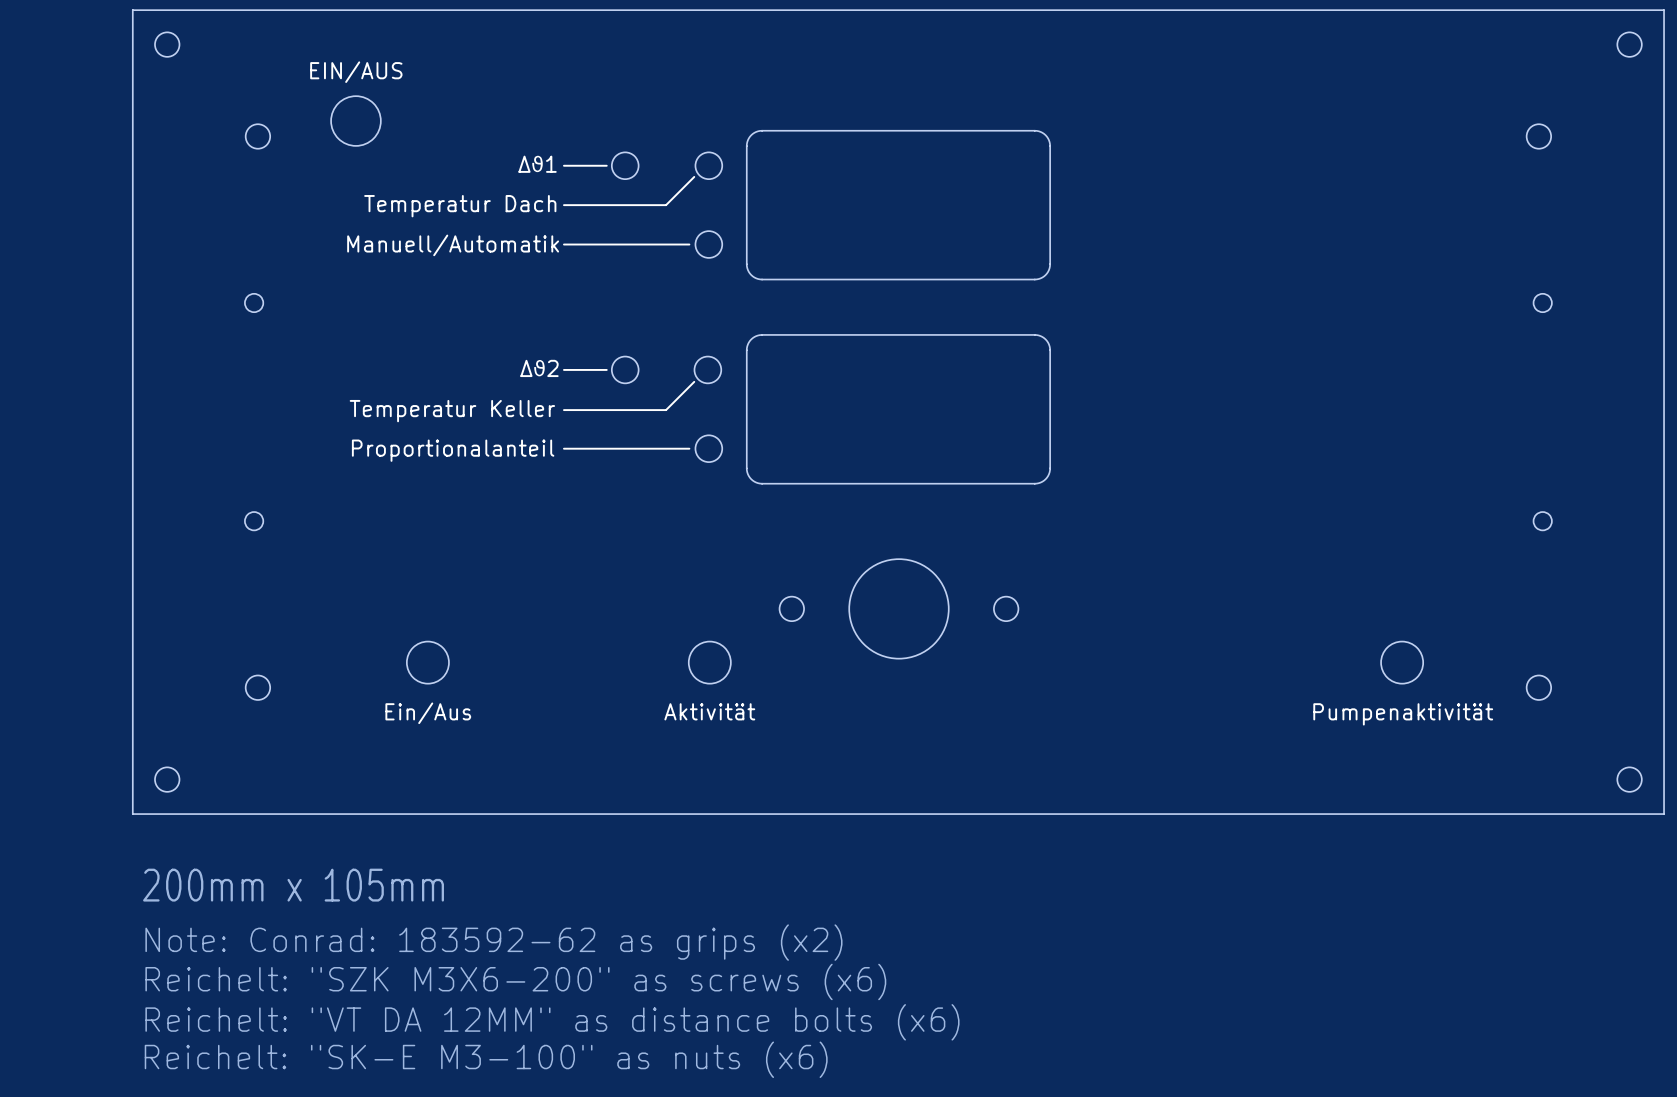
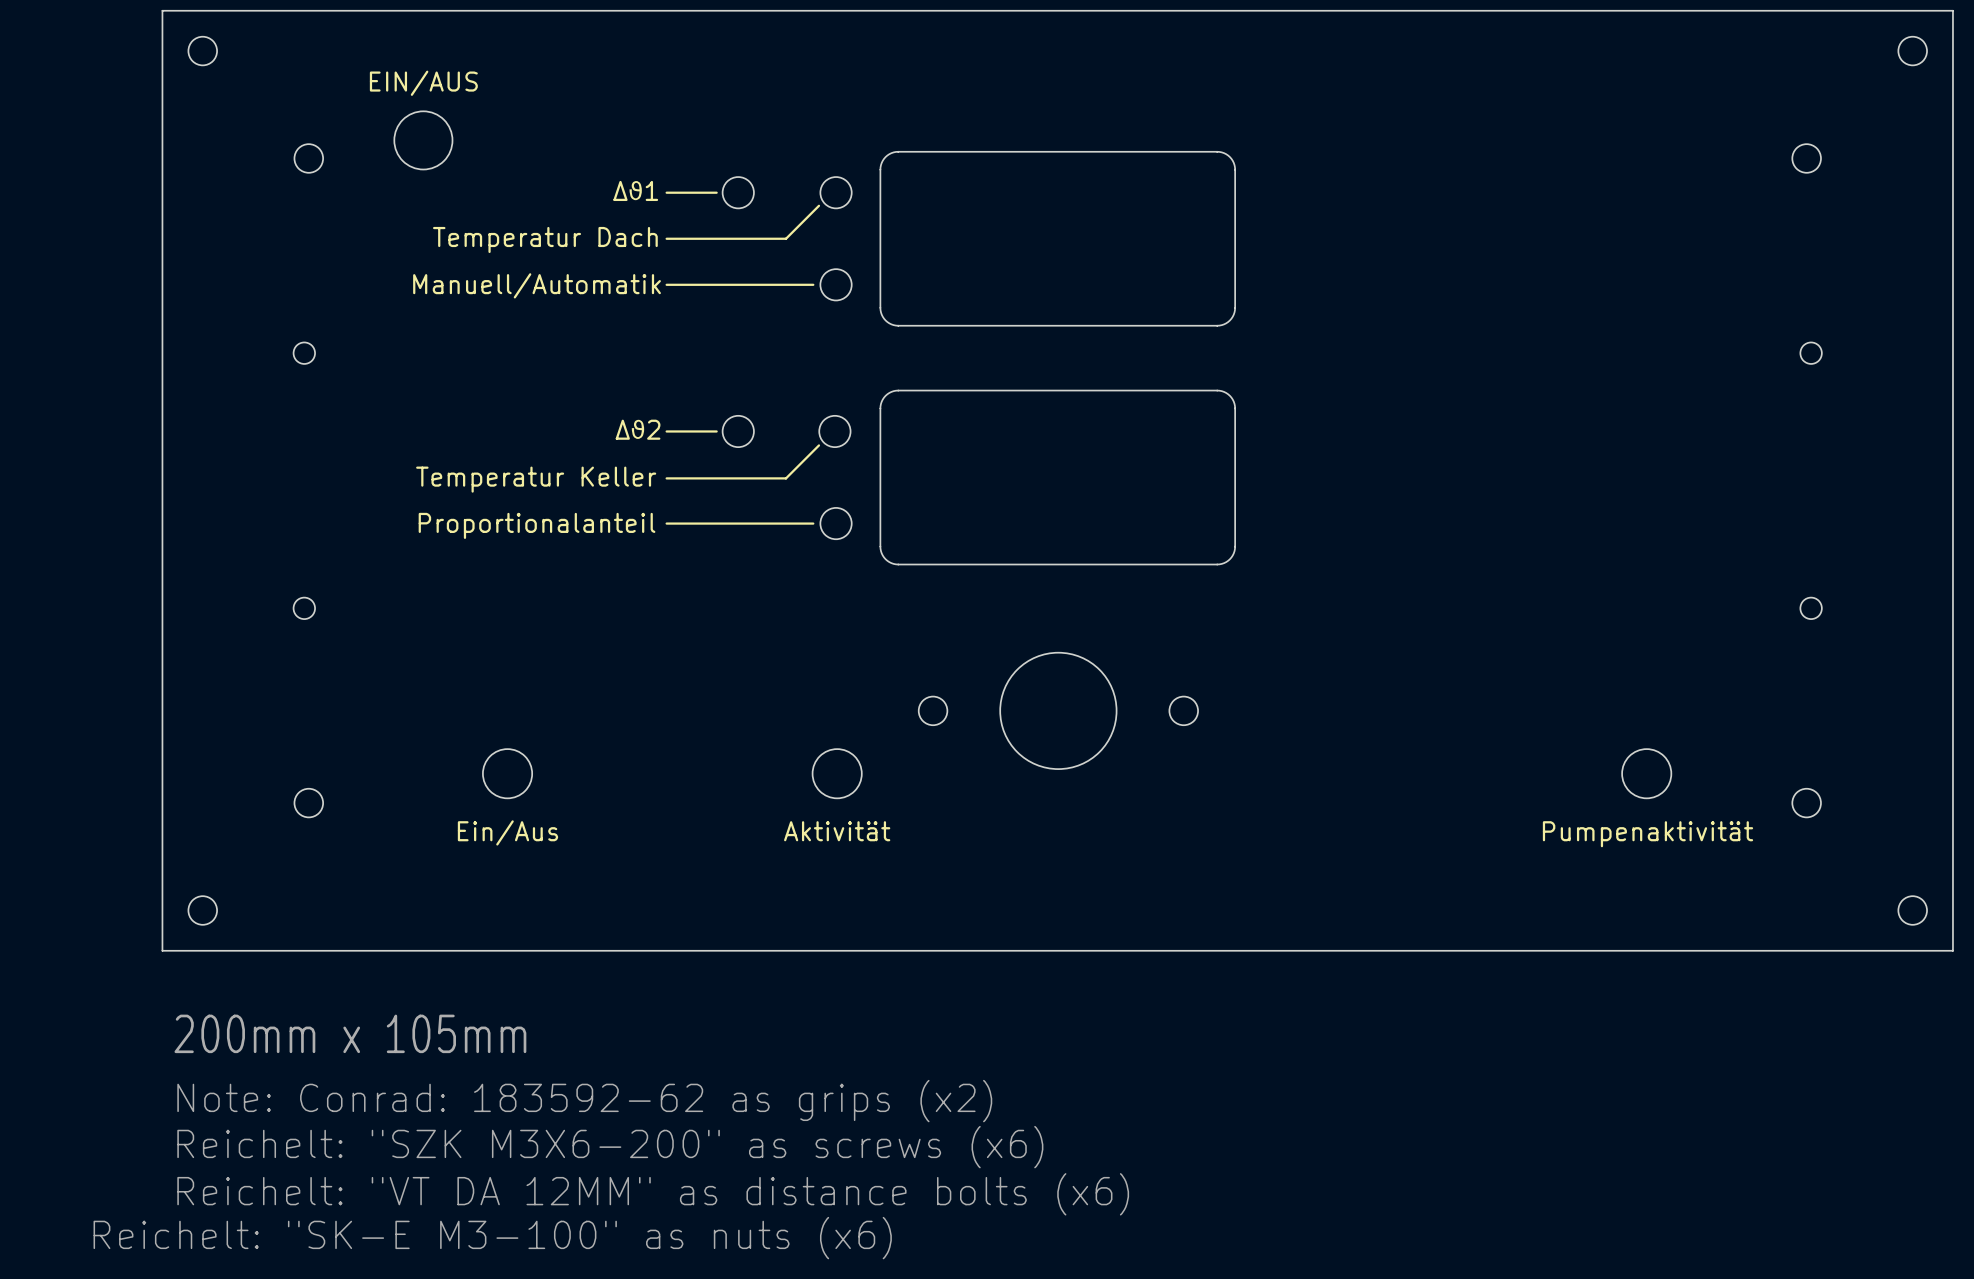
text position: Reichelt: "SK-E M3-100" as nuts (x6) (486, 1059) -> Reichelt: "SK-E M3-100" as nuts (x6) (492, 1238)

